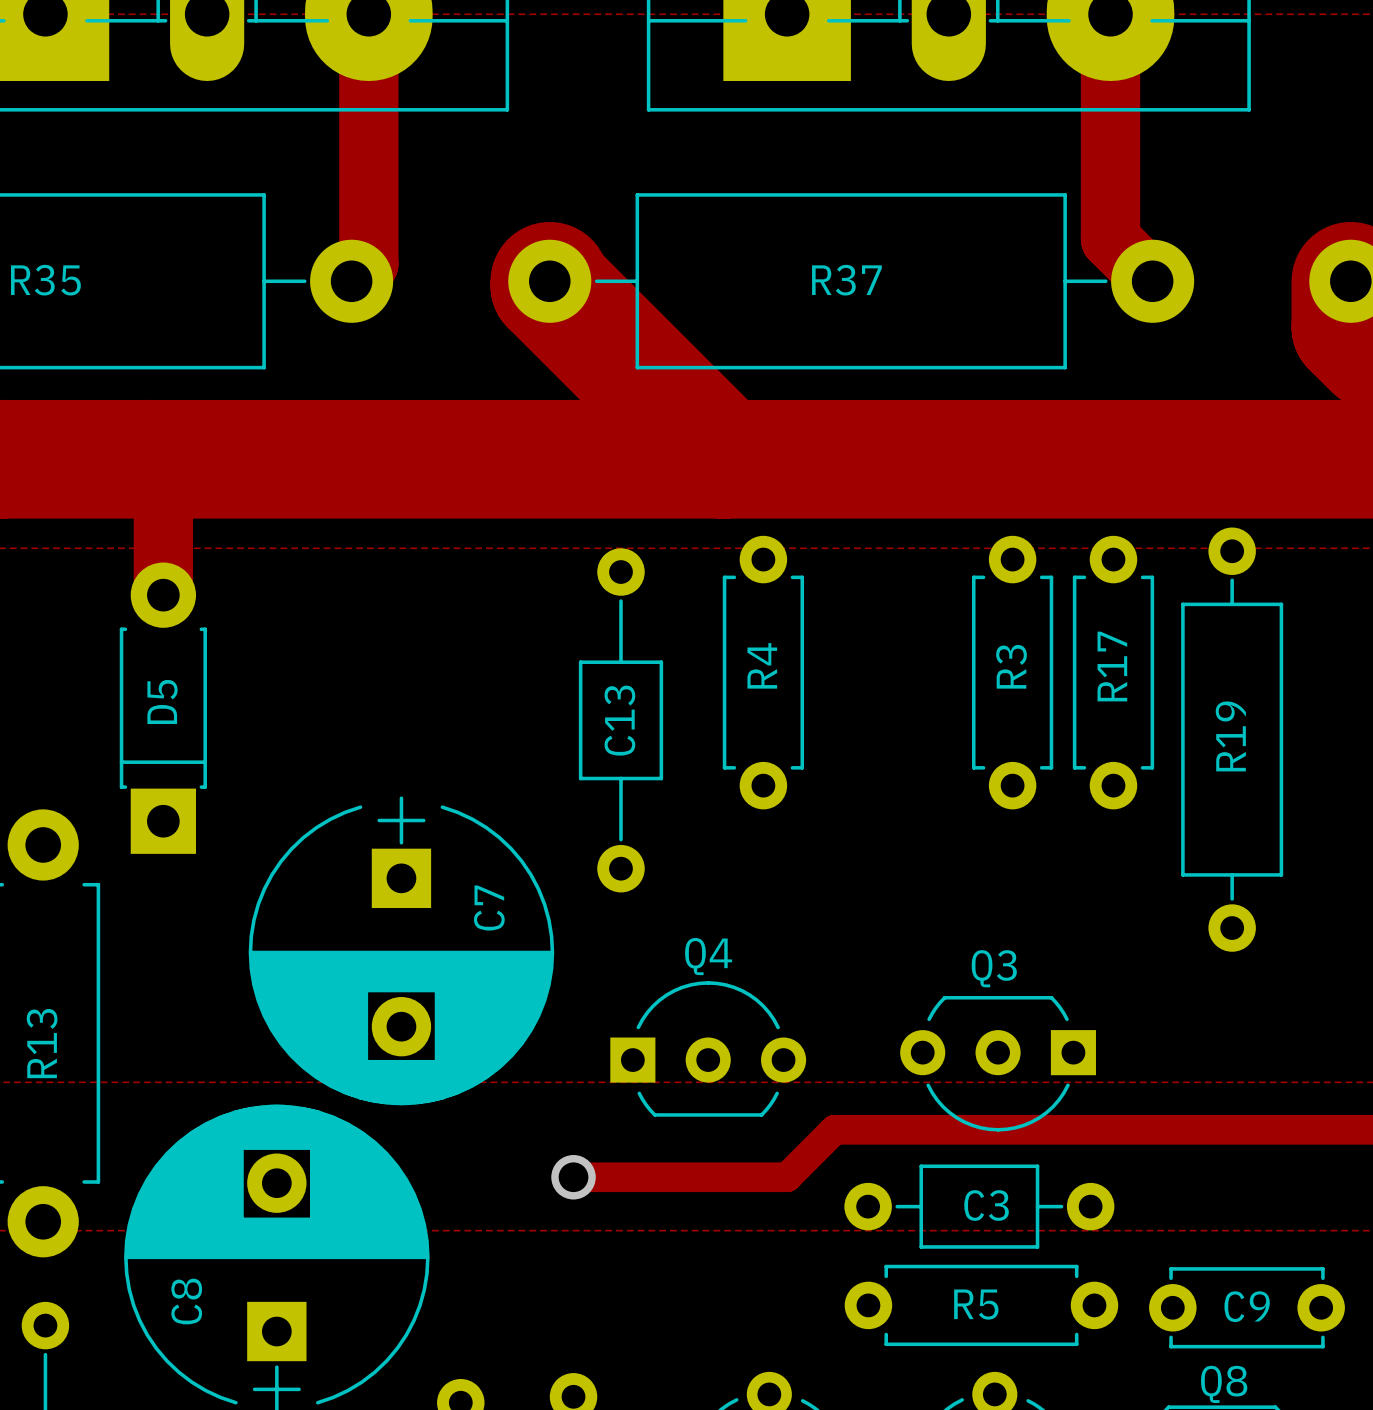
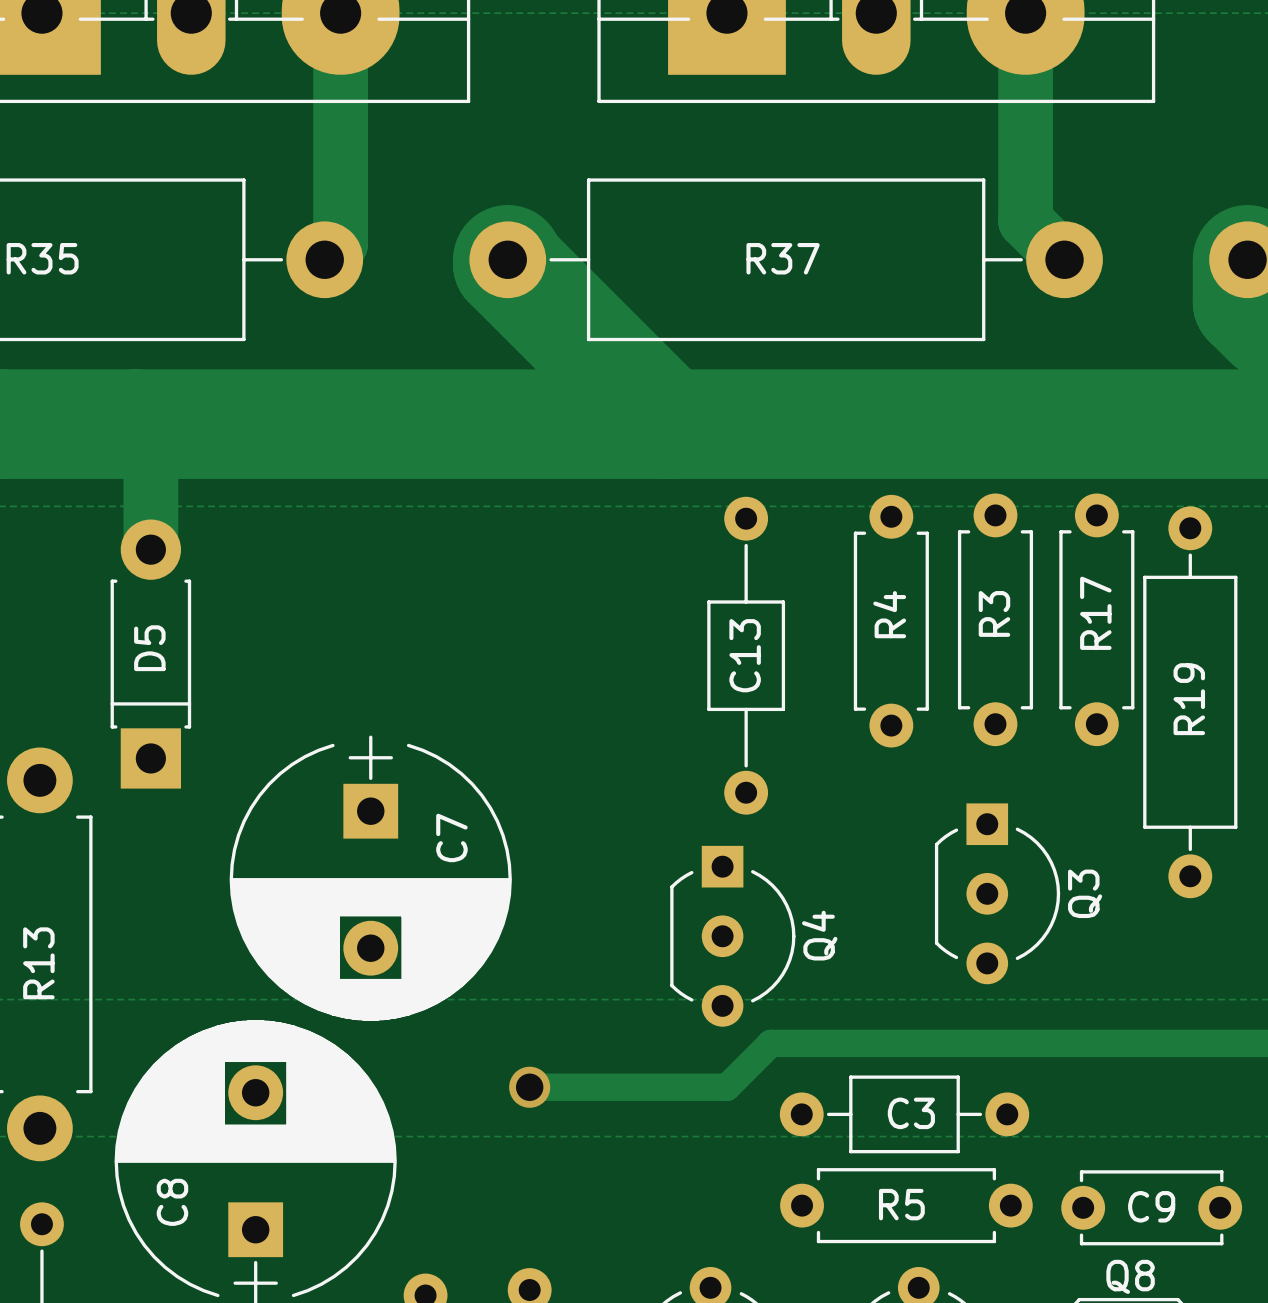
R4 position: (763, 672) -> (891, 621)
R3 position: (1012, 672) -> (995, 619)
R17 position: (1113, 672) -> (1096, 619)
C13 position: (620, 720) -> (746, 655)
R19 position: (1232, 739) -> (1190, 702)
Q3 name position: Q3 (994, 968) -> Q3 (1085, 893)
Q4 rotation: 0° (708, 1048) -> 90° clockwise (732, 936)
Q3 rotation: 0° (998, 1063) -> 90° counterclockwise (997, 893)
Q3 position: (998, 1063) -> (997, 893)

